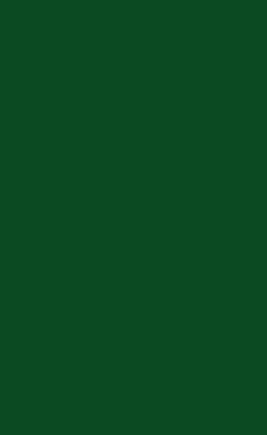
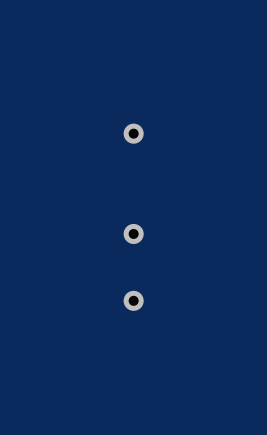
via: none -> (133, 133)
via: none -> (133, 233)
via: none -> (133, 300)

